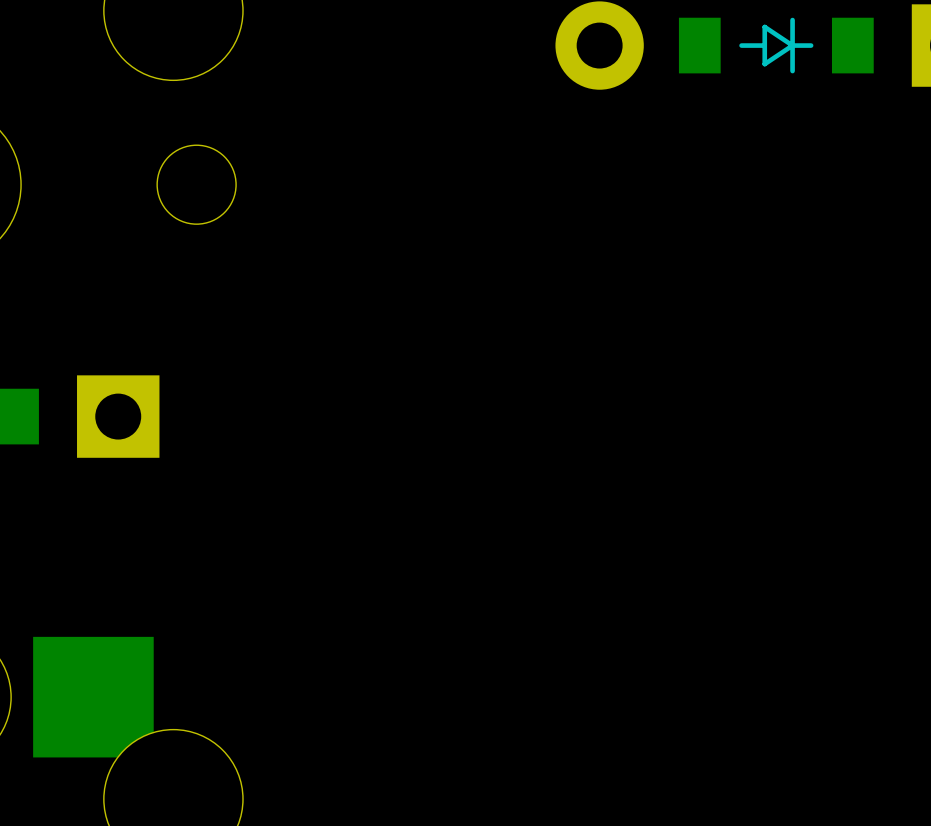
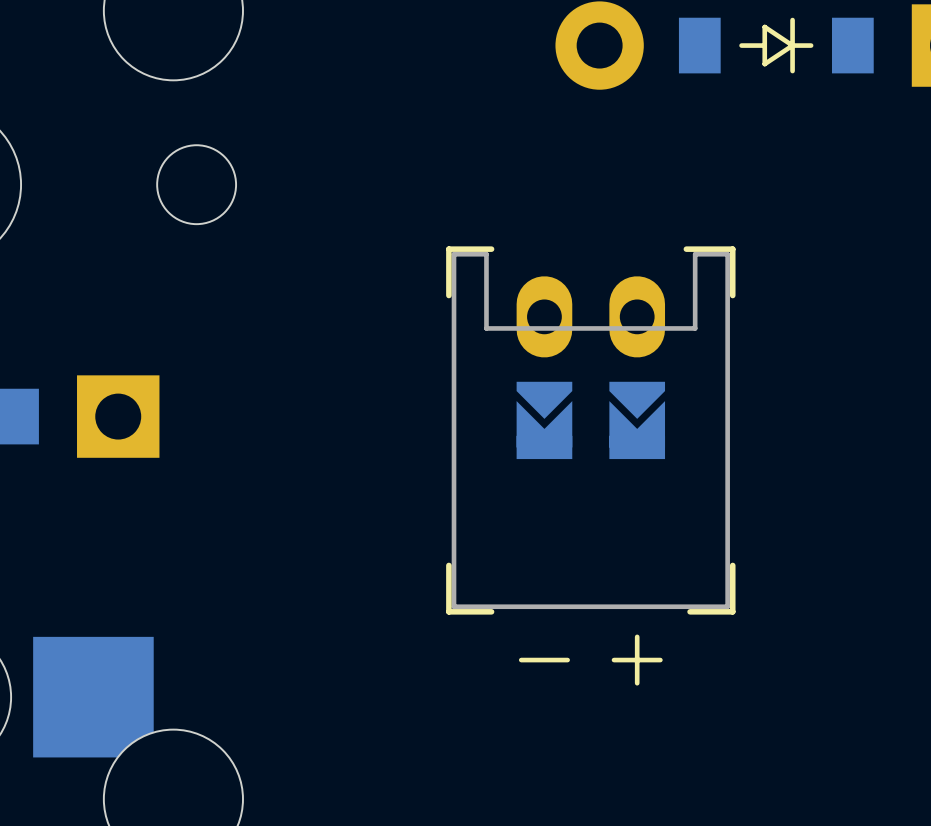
part: none -> (590, 465)

